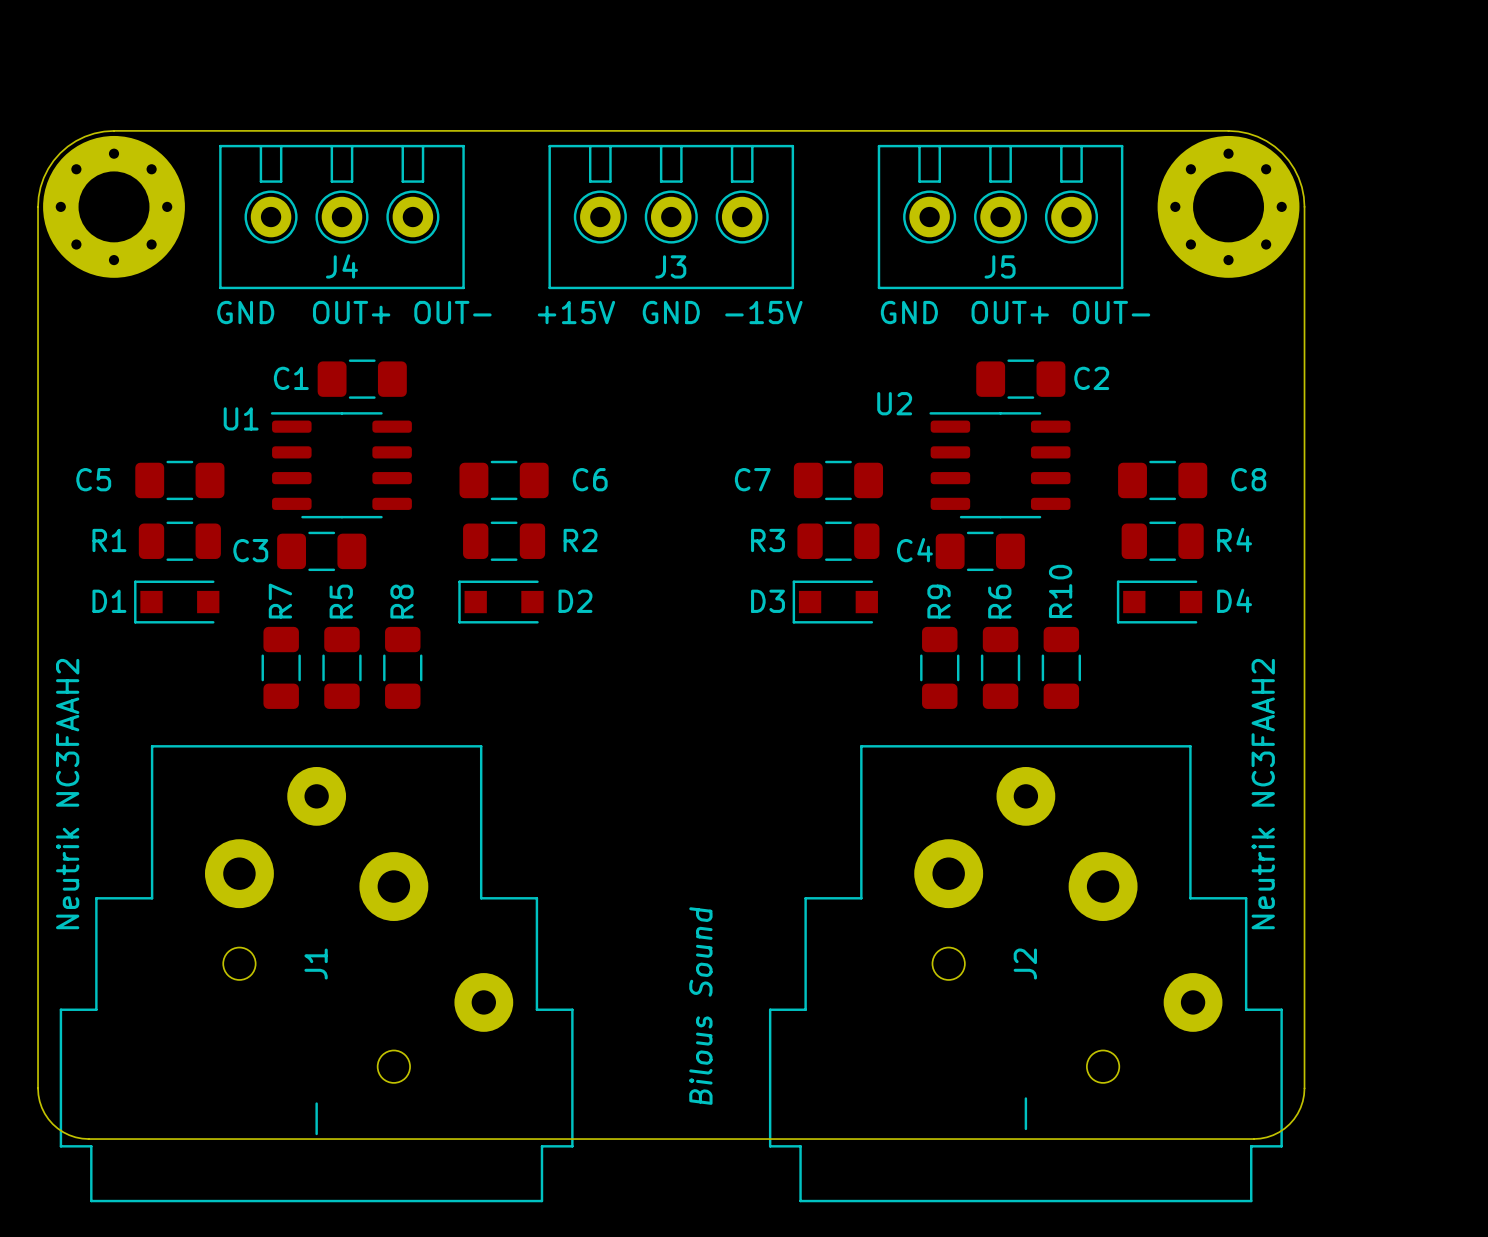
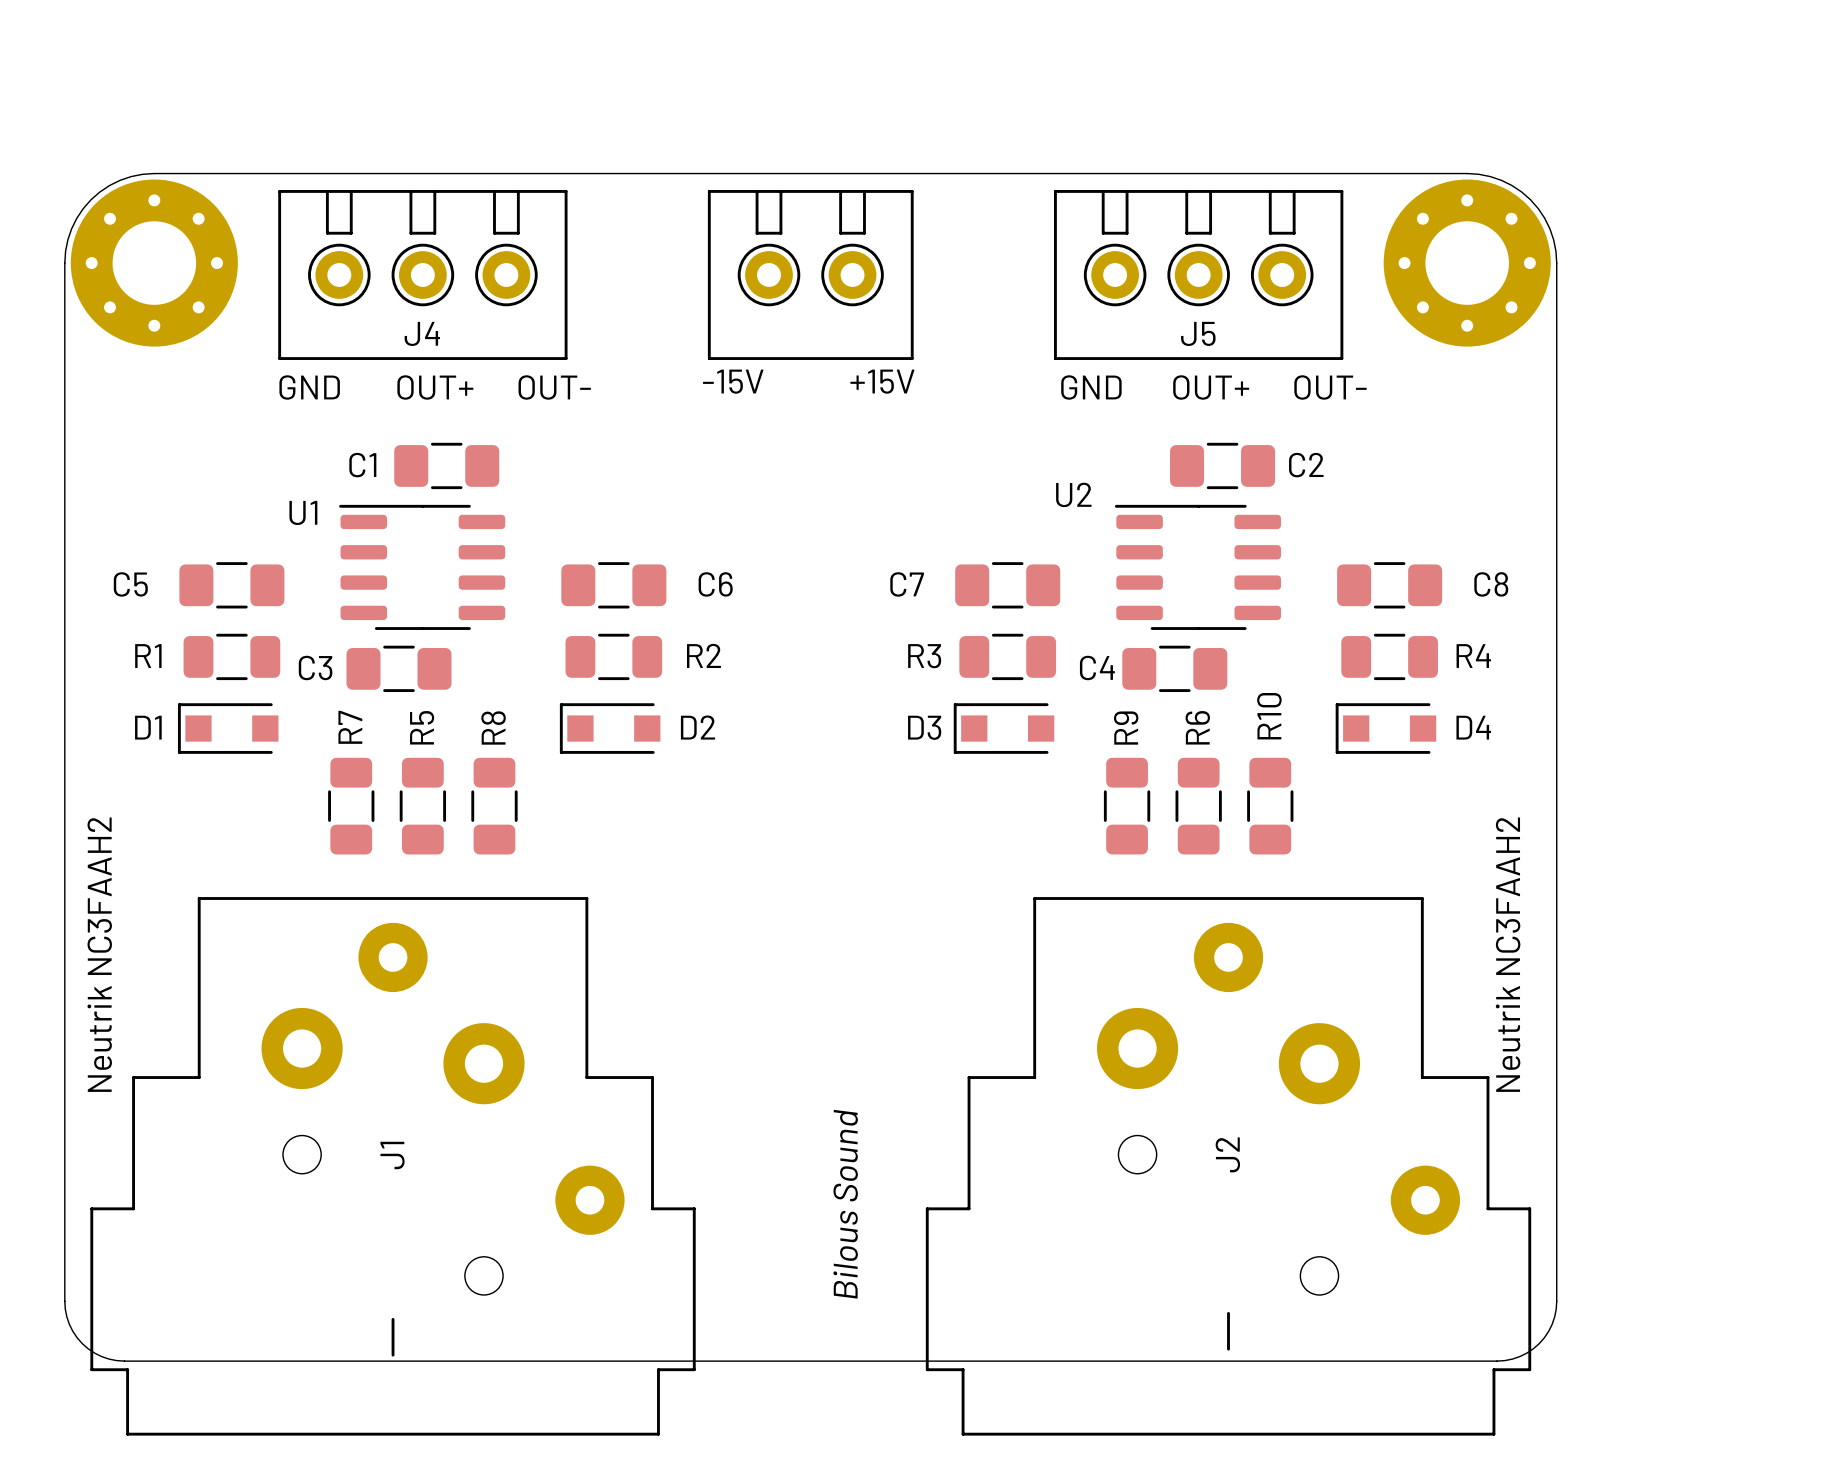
J3: (671, 217) -> none
part: none -> (810, 275)
text position: +15V (576, 312) -> +15V (882, 381)
text: GND (671, 312) -> none
text position: -15V (763, 312) -> -15V (733, 381)

